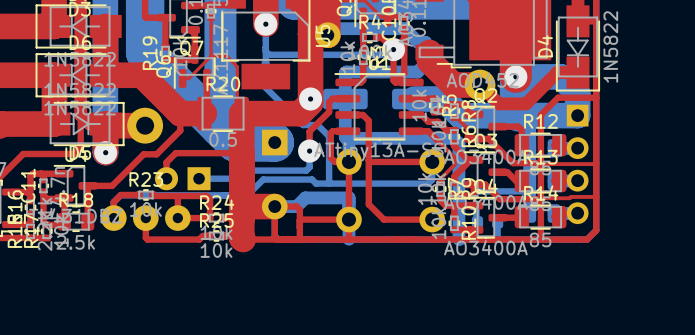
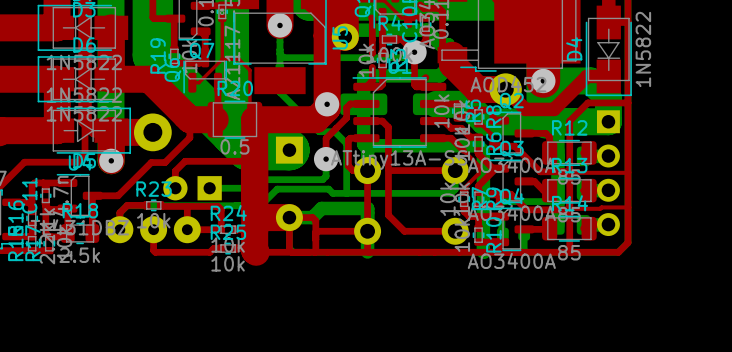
top track: none -> (420, 4) (423, 8) (439, 8) (442, 11) (442, 46) (452, 55)
top track: none -> (371, 17) (372, 53)
top track: none -> (386, 39) (396, 39)
top track: (404, 38) (404, 73) -> none
top track: none -> (372, 67) (372, 80) (366, 86)

